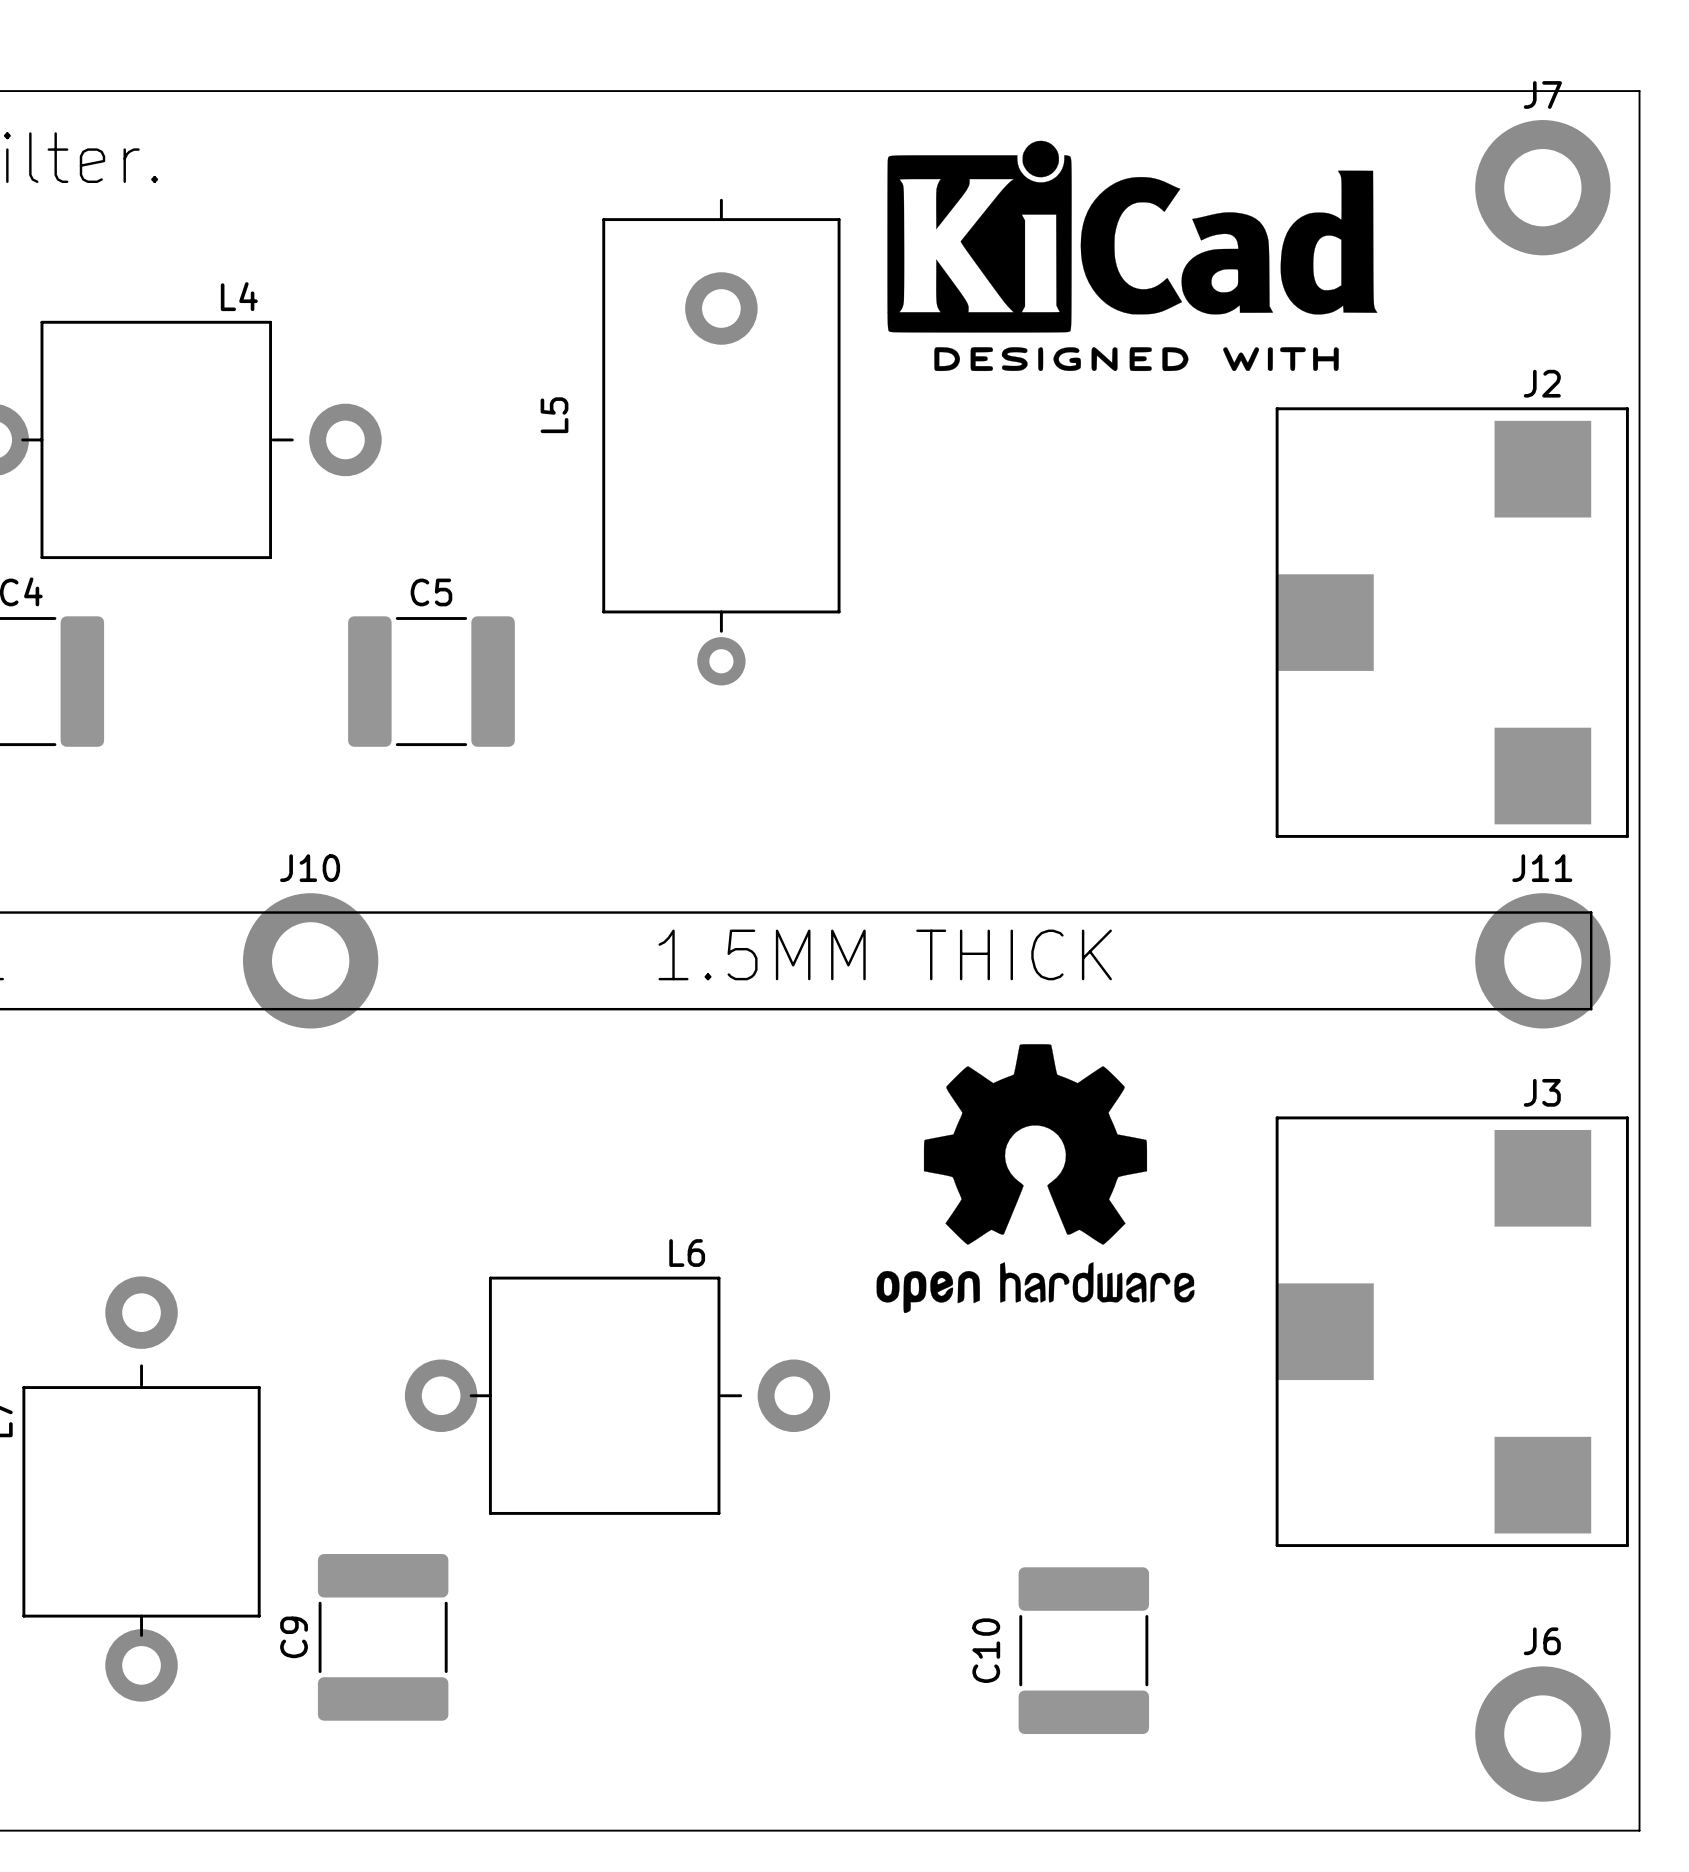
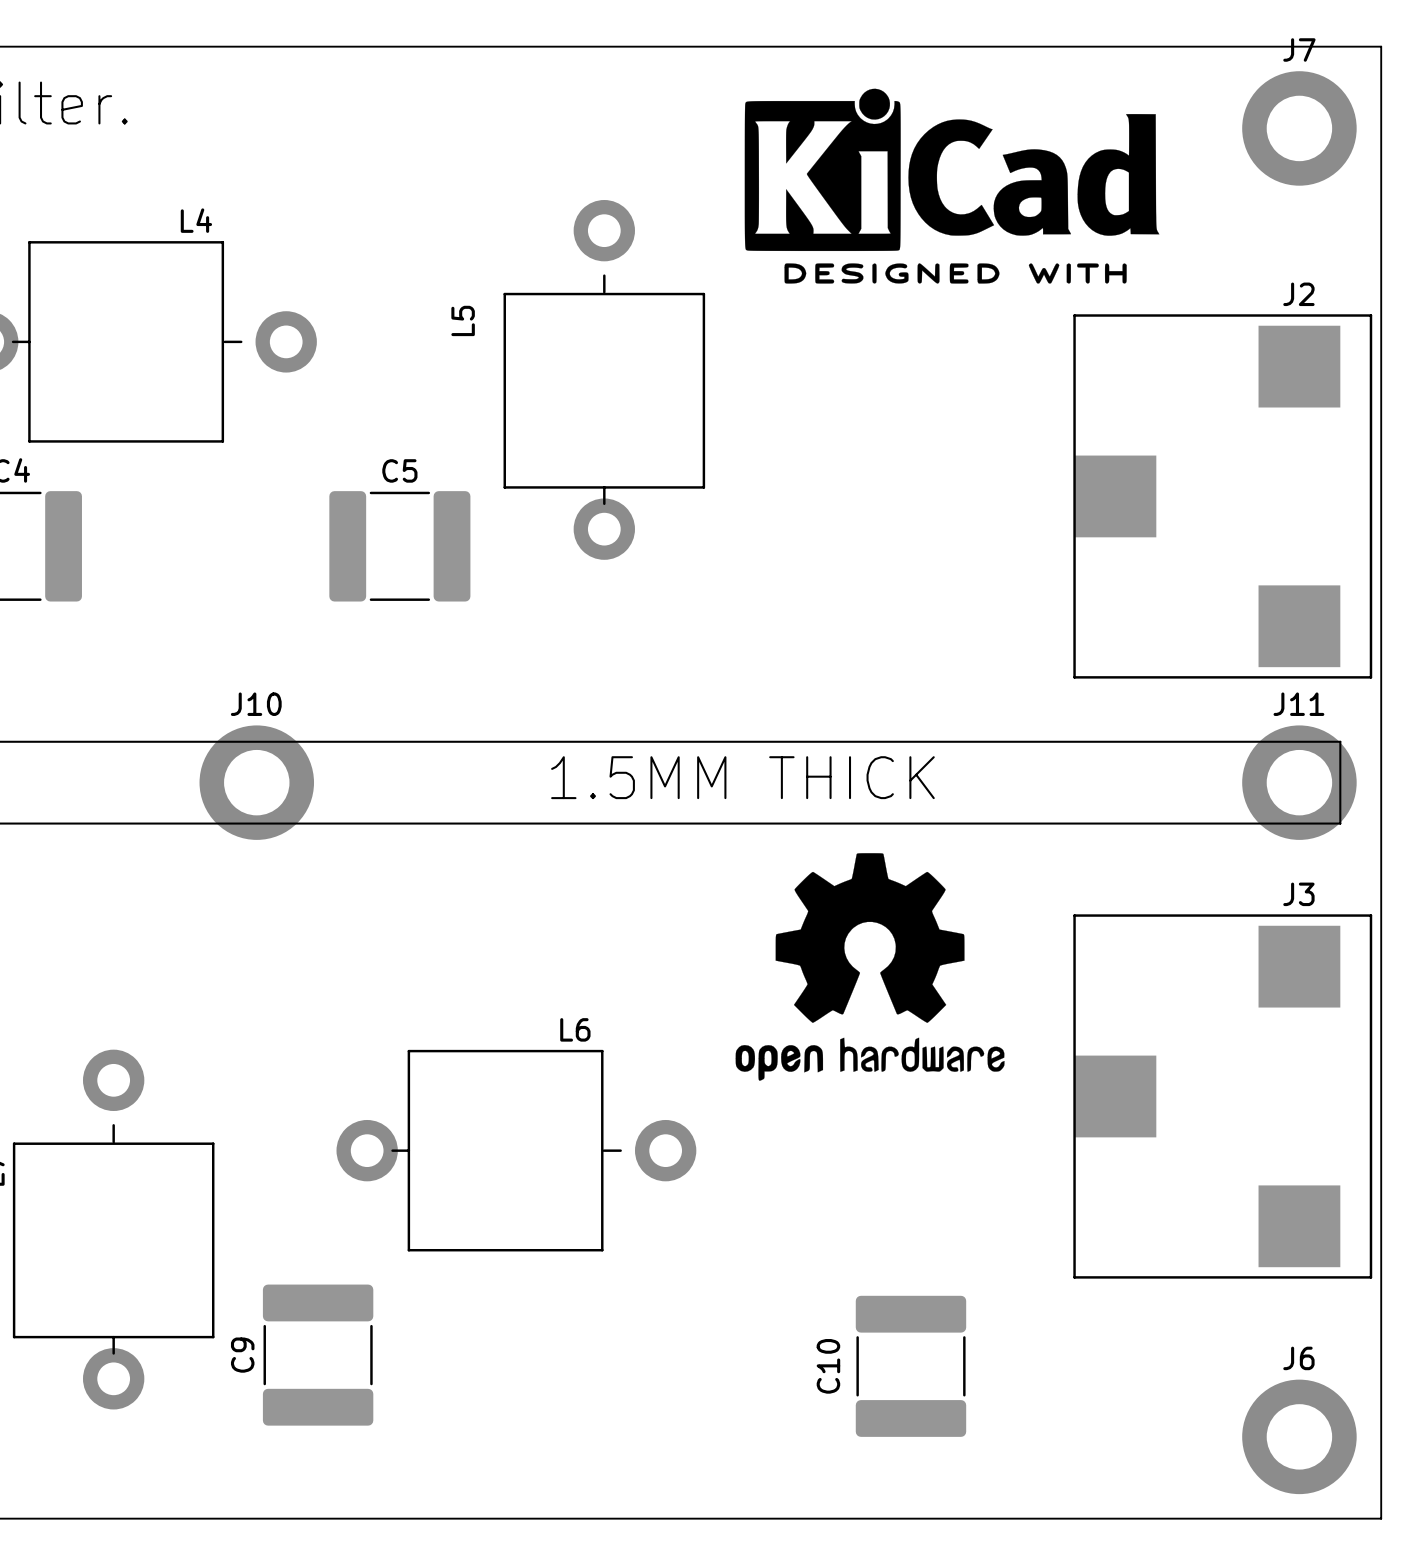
L5 footprint: [602, 198, 841, 686] -> [503, 200, 706, 560]
C5 position: (431, 681) -> (399, 546)

